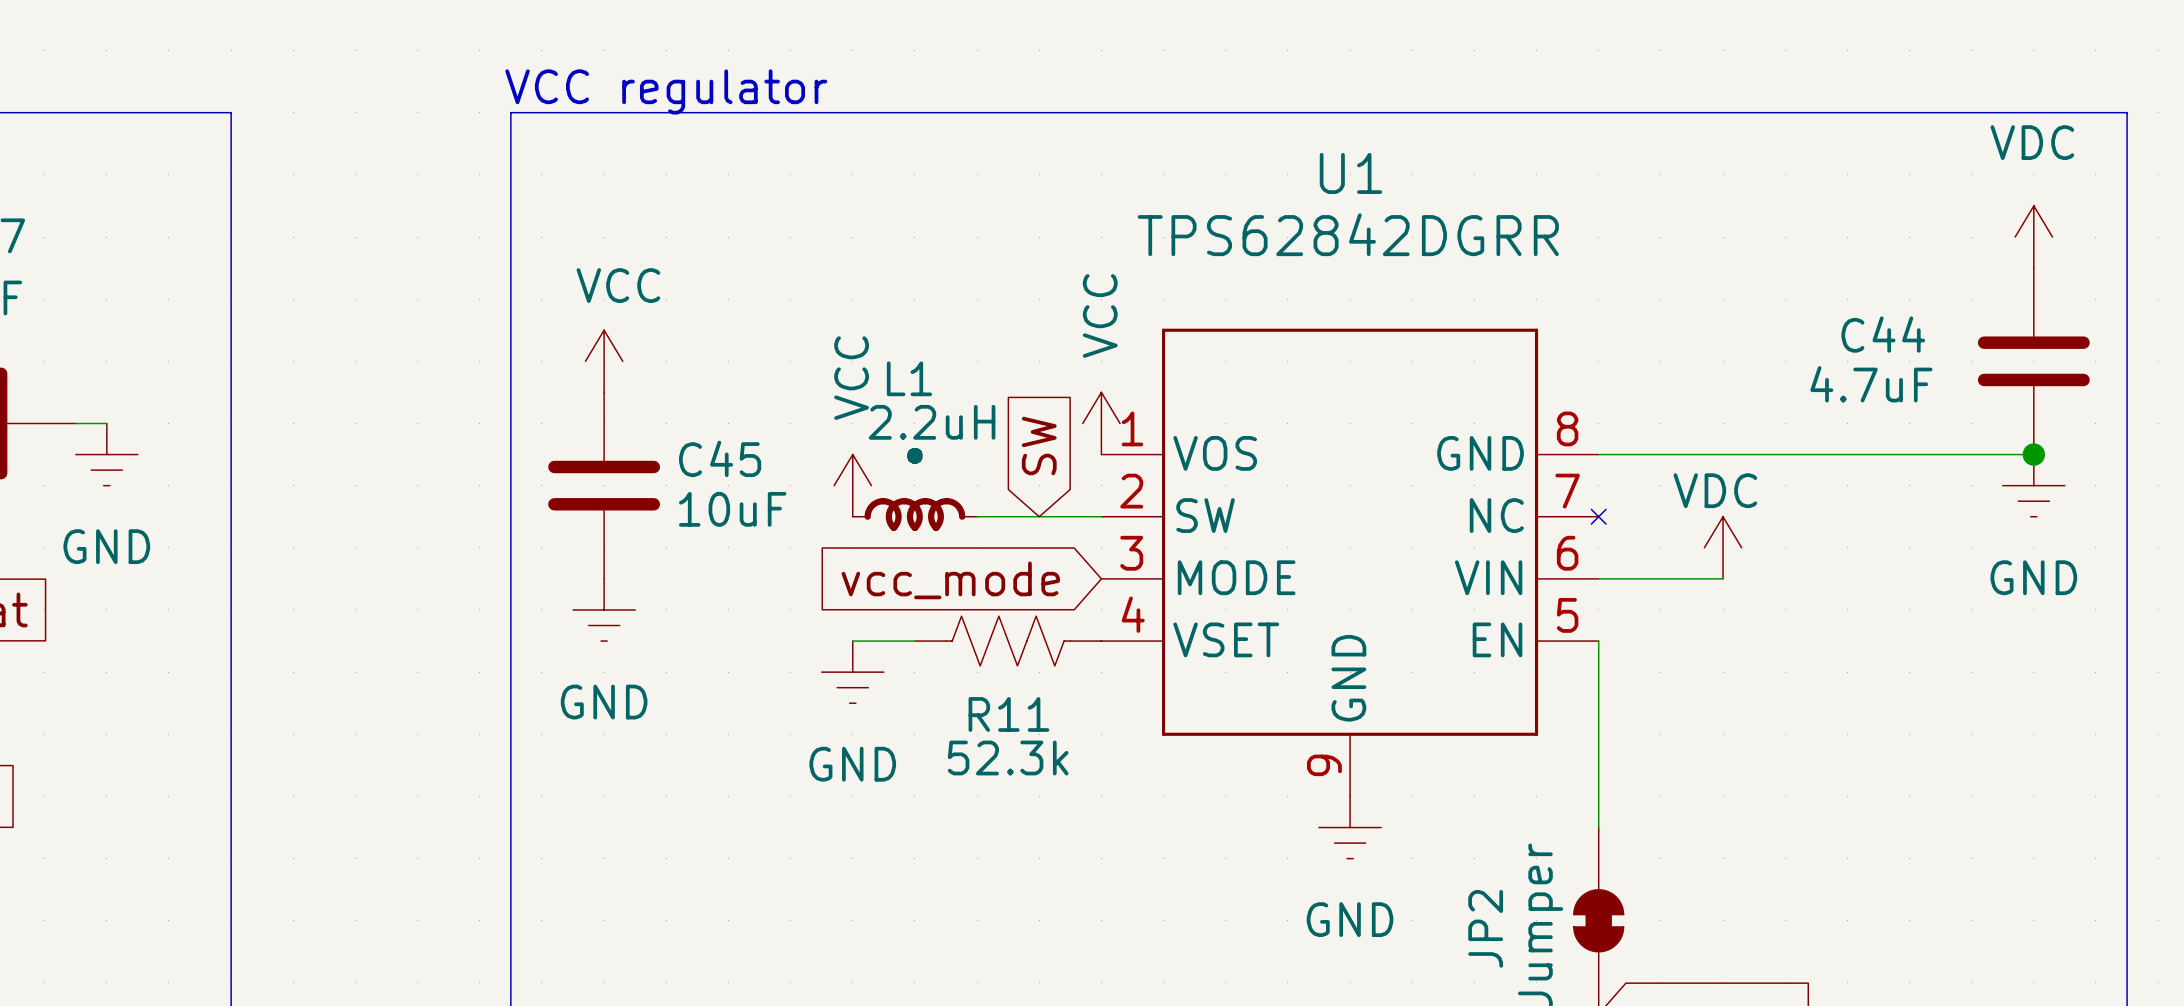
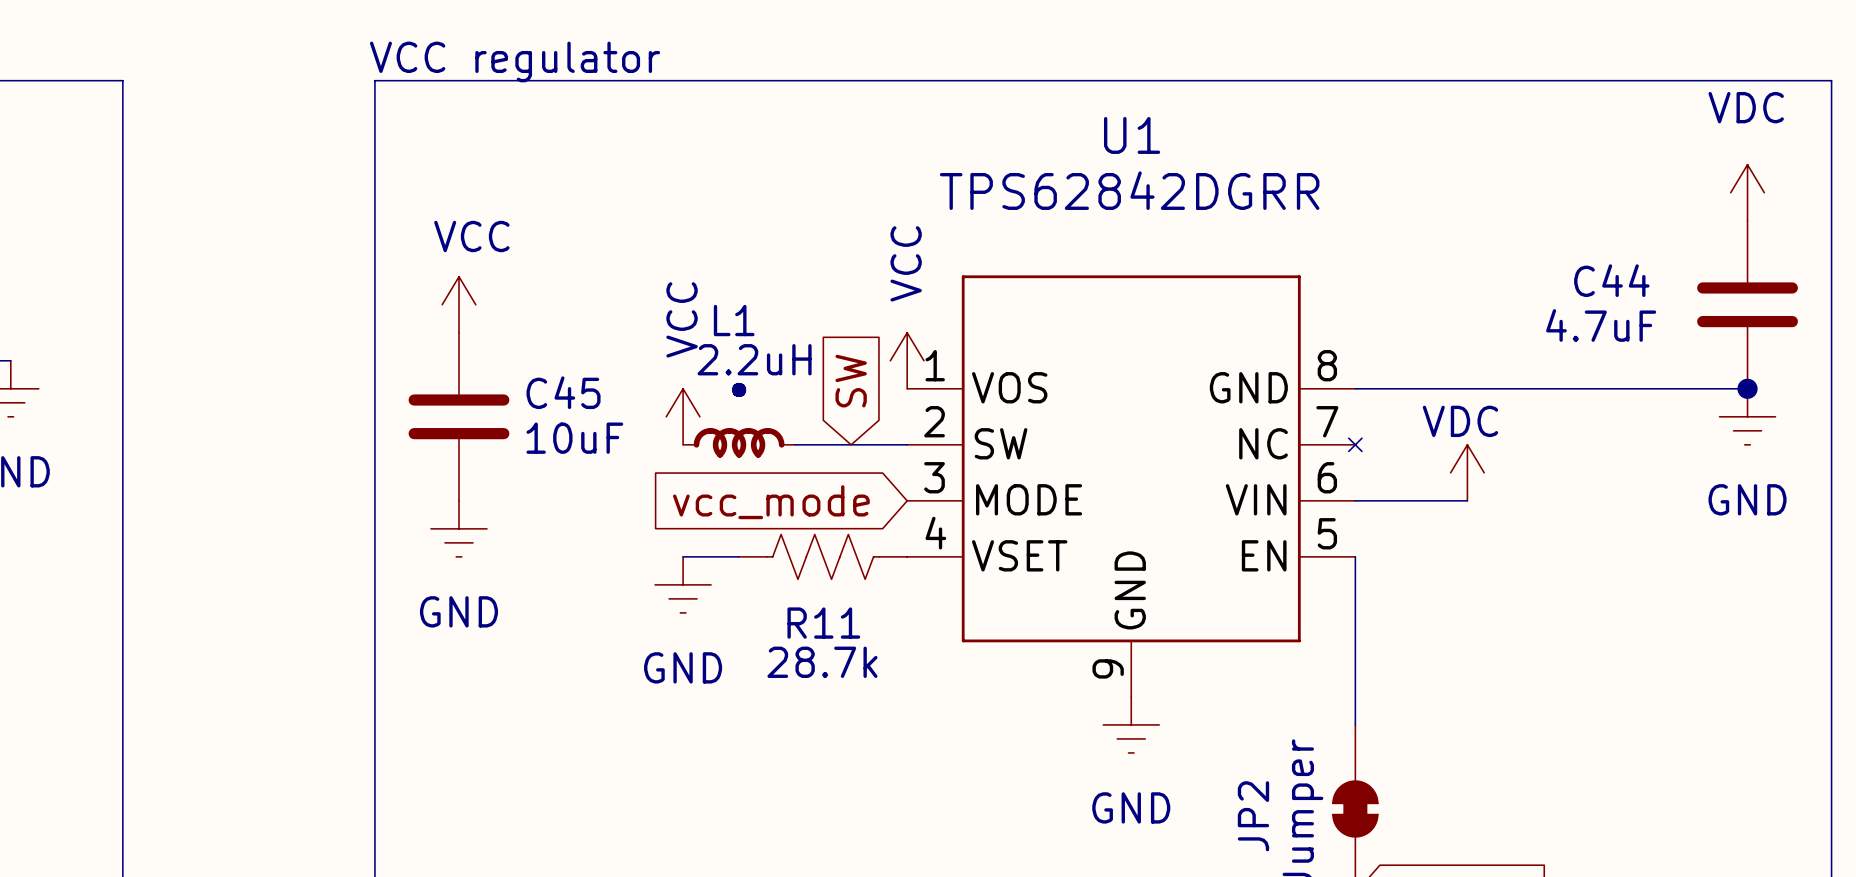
R11 value: 52.3k (1008, 758) -> 28.7k (822, 662)

